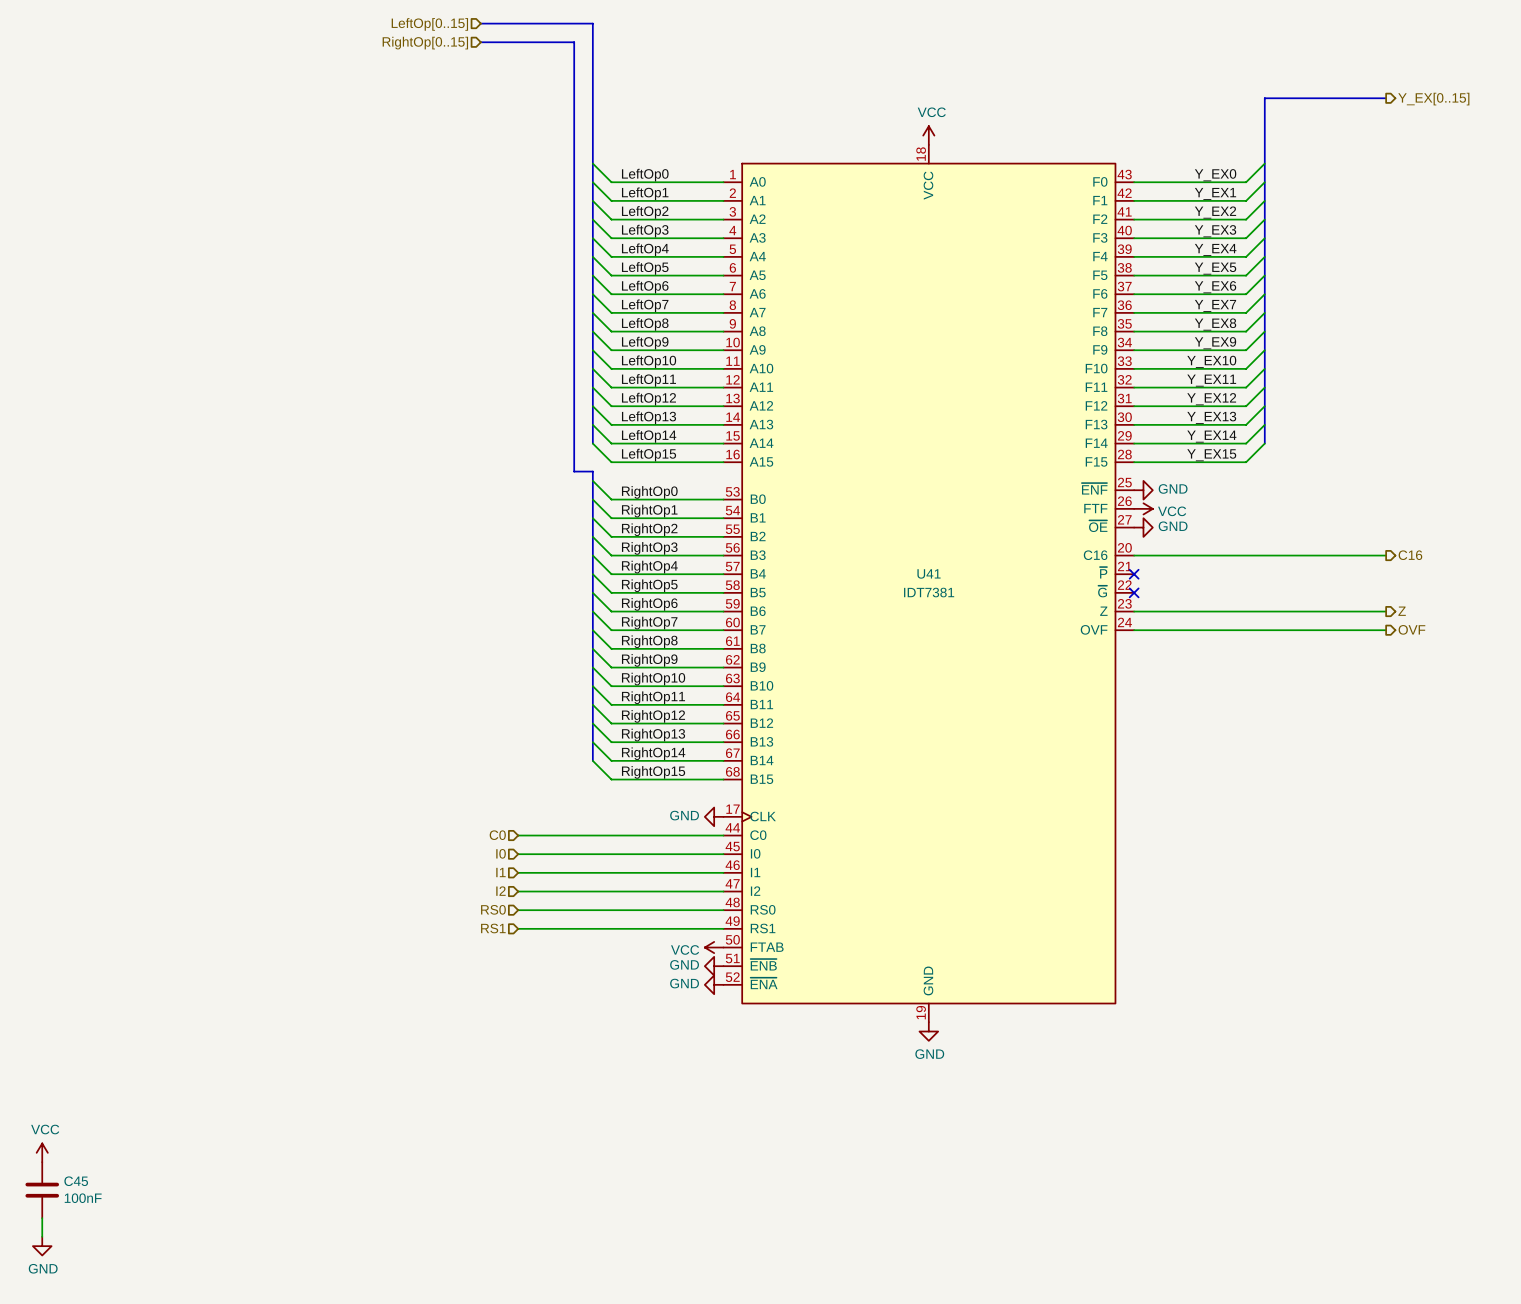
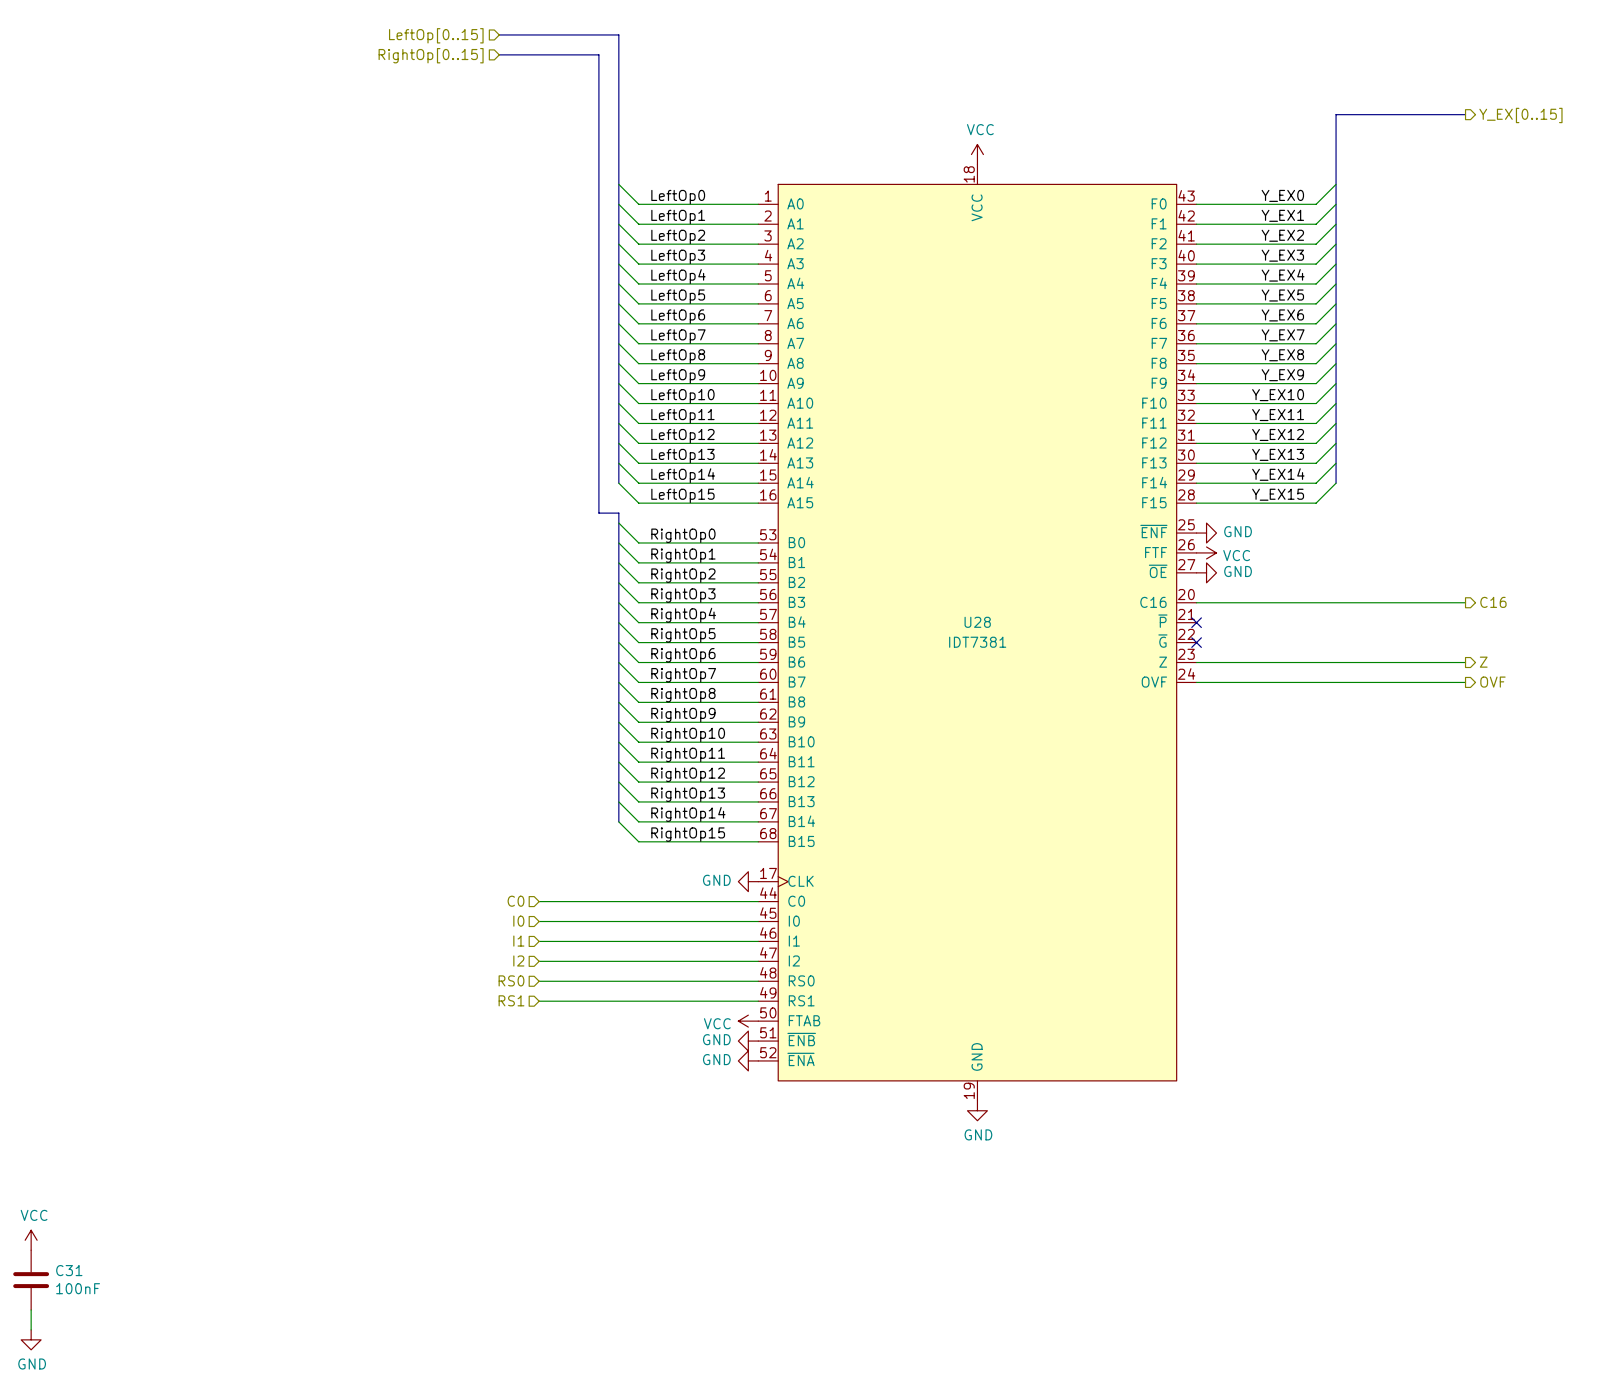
U41 name: U41 (929, 573) -> U28 (977, 622)
C45 name: C45 (76, 1181) -> C31 (69, 1270)

